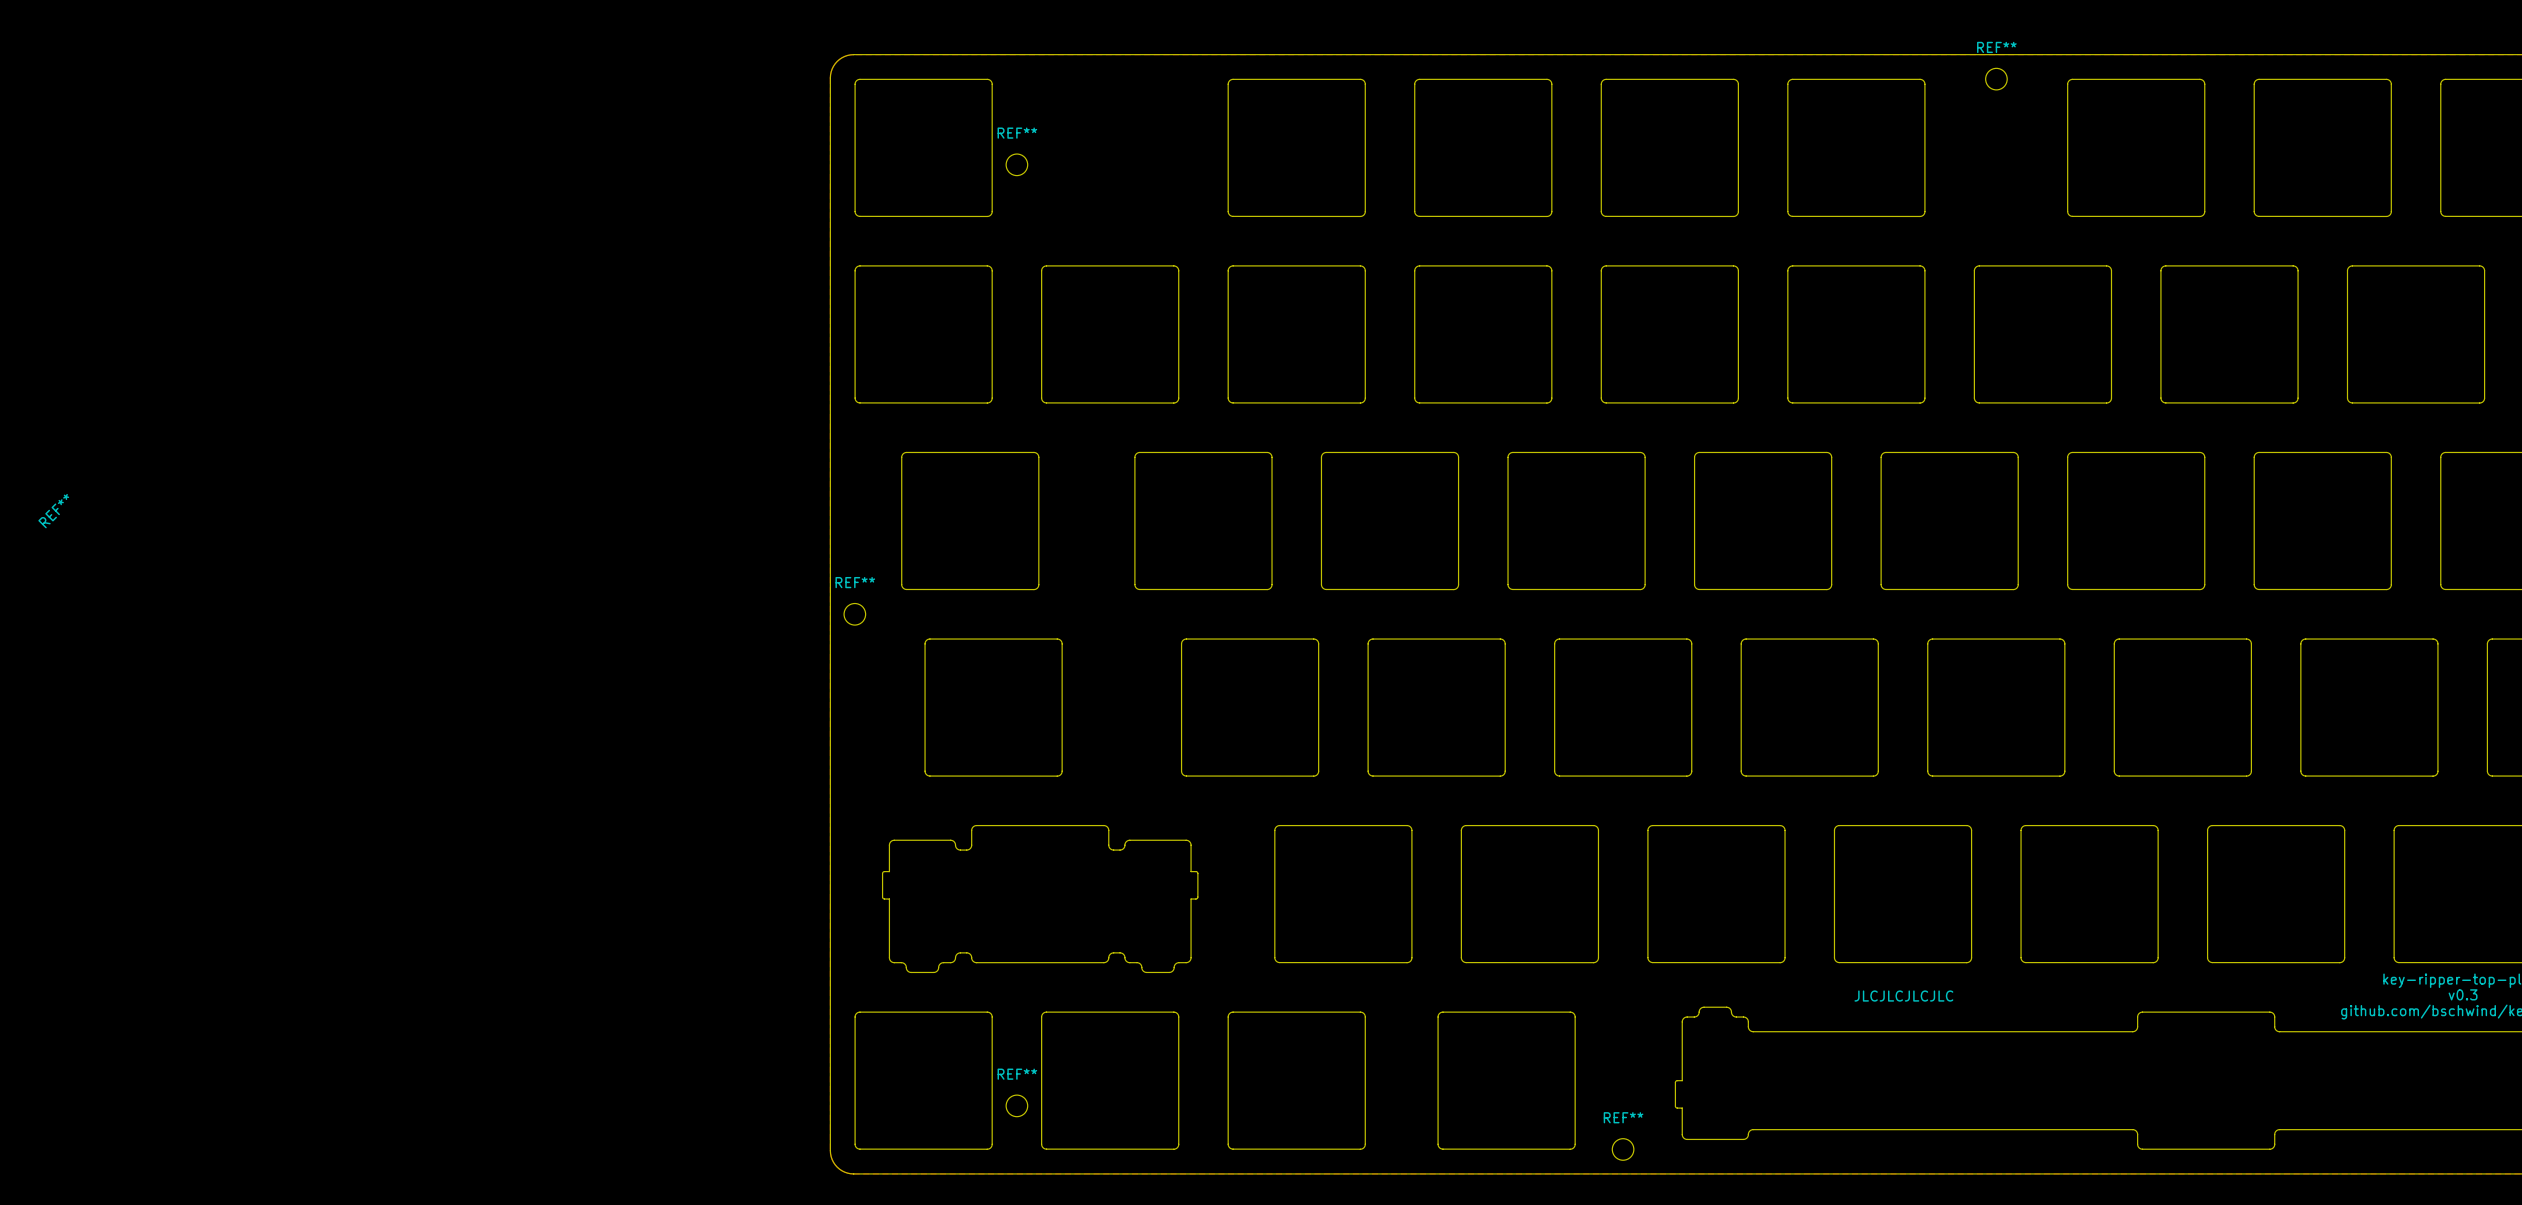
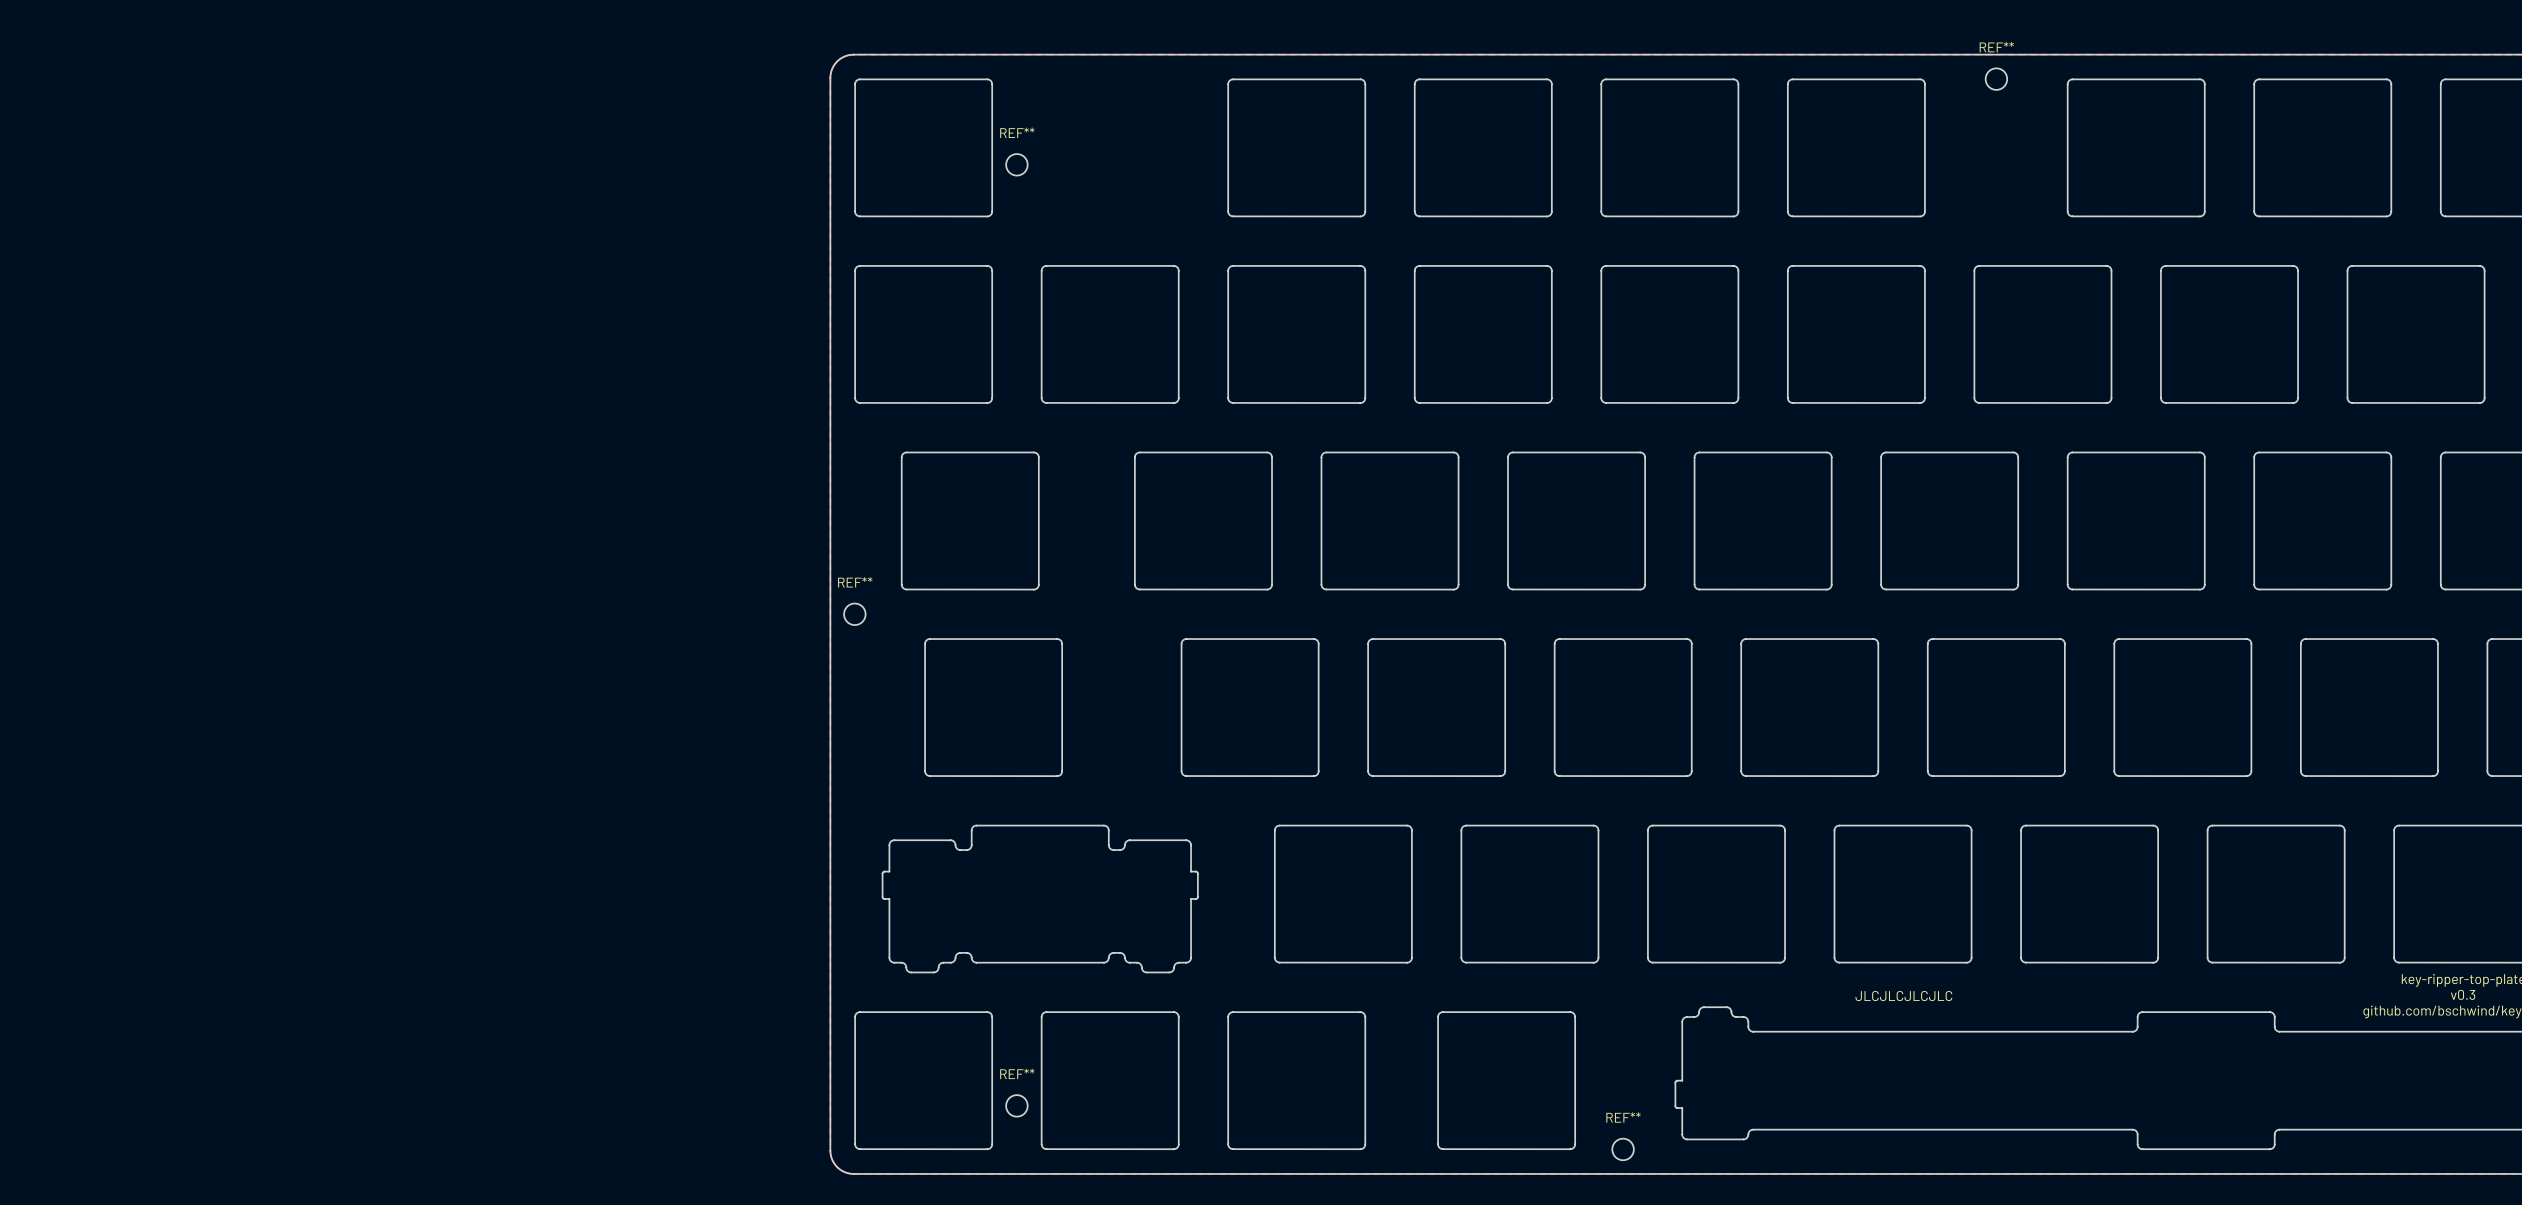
REF**: (53, 511) -> none

